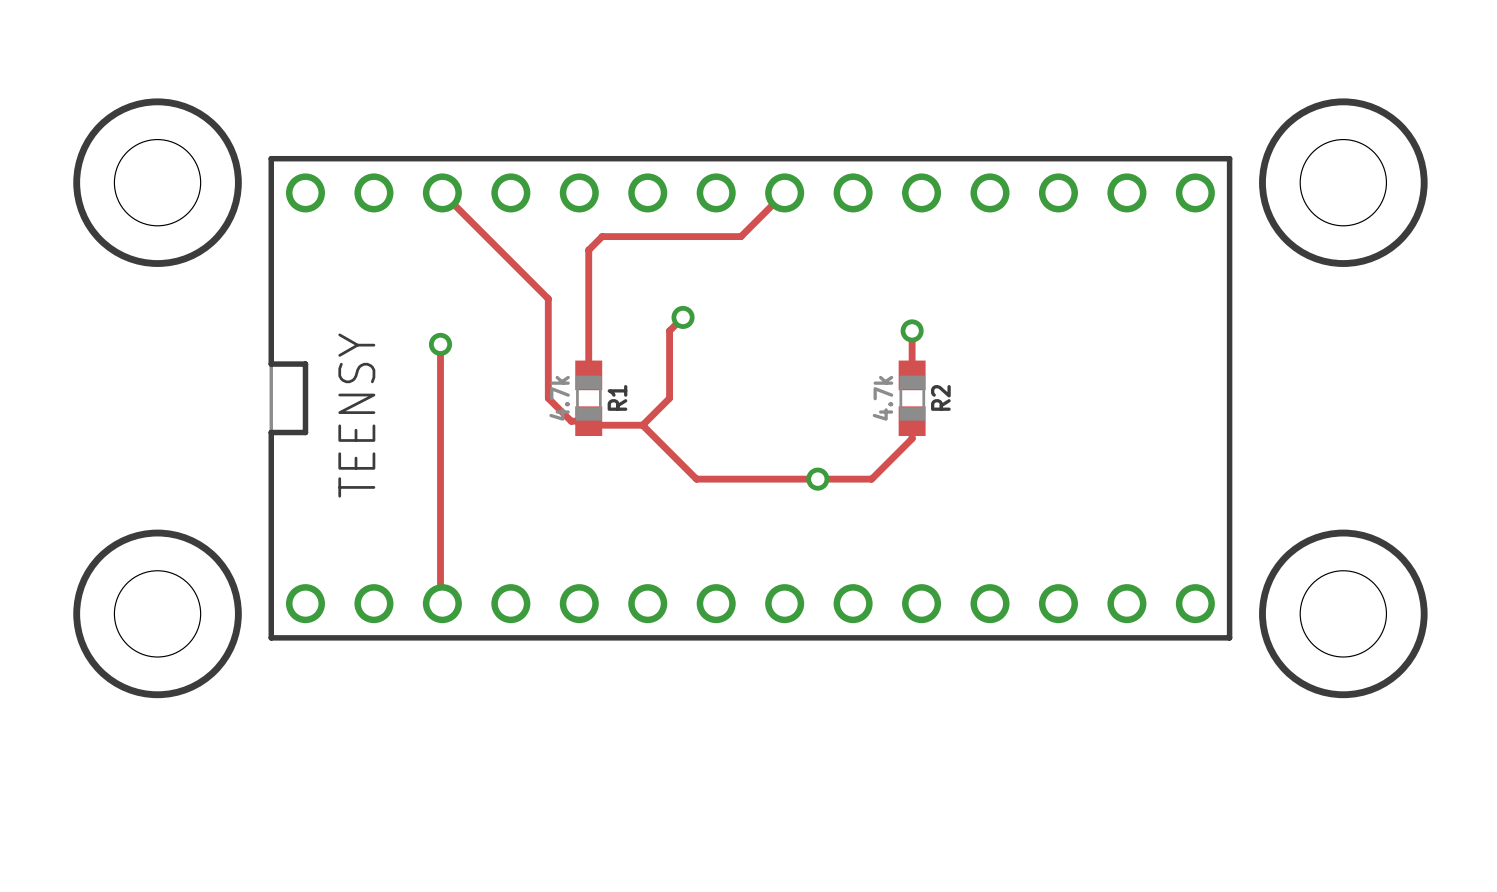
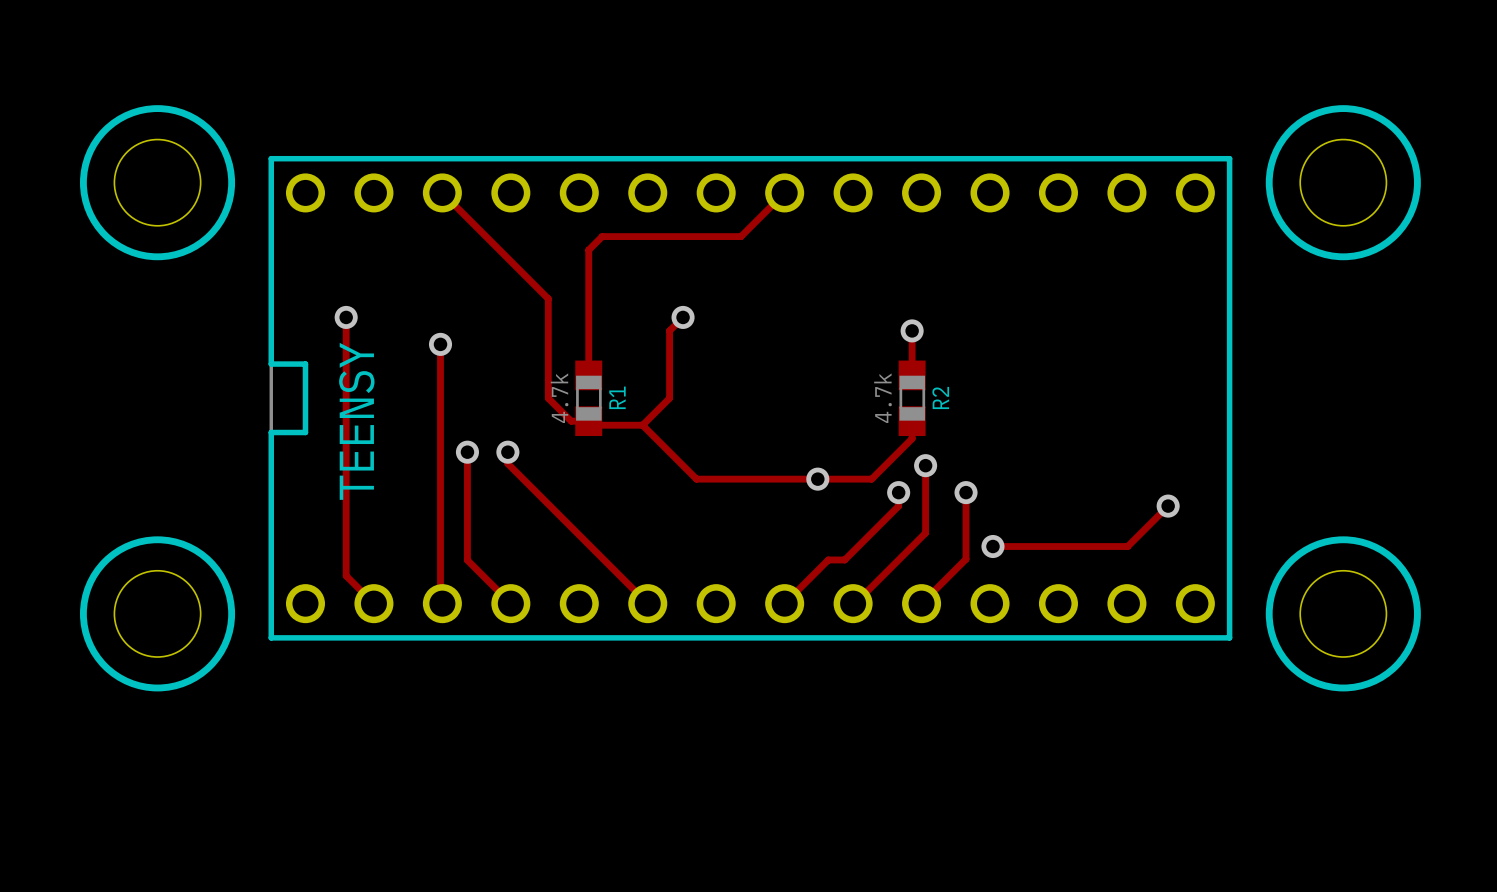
drawing shape: [73, 98, 242, 267] -> [80, 105, 236, 261]
drawing shape: [1259, 98, 1428, 267] -> [1265, 105, 1421, 261]
track: none -> (346, 317) (346, 575) (373, 603)
via: none -> (346, 317)
track: none -> (467, 452) (467, 560) (510, 603)
via: none -> (467, 452)
track: none -> (507, 452) (507, 463) (647, 603)
via: none -> (507, 452)
track: none -> (925, 465) (925, 533) (853, 603)
via: none -> (925, 465)
track: none -> (898, 492) (898, 506) (844, 559) (828, 559) (784, 603)
via: none -> (898, 492)
track: none -> (966, 492) (966, 559) (921, 603)
via: none -> (966, 492)
track: none -> (1168, 506) (1127, 546) (992, 546)
via: none -> (1168, 506)
drawing shape: [73, 529, 242, 699] -> [80, 536, 236, 692]
drawing shape: [1259, 529, 1428, 699] -> [1265, 536, 1421, 692]
via: none -> (992, 546)

